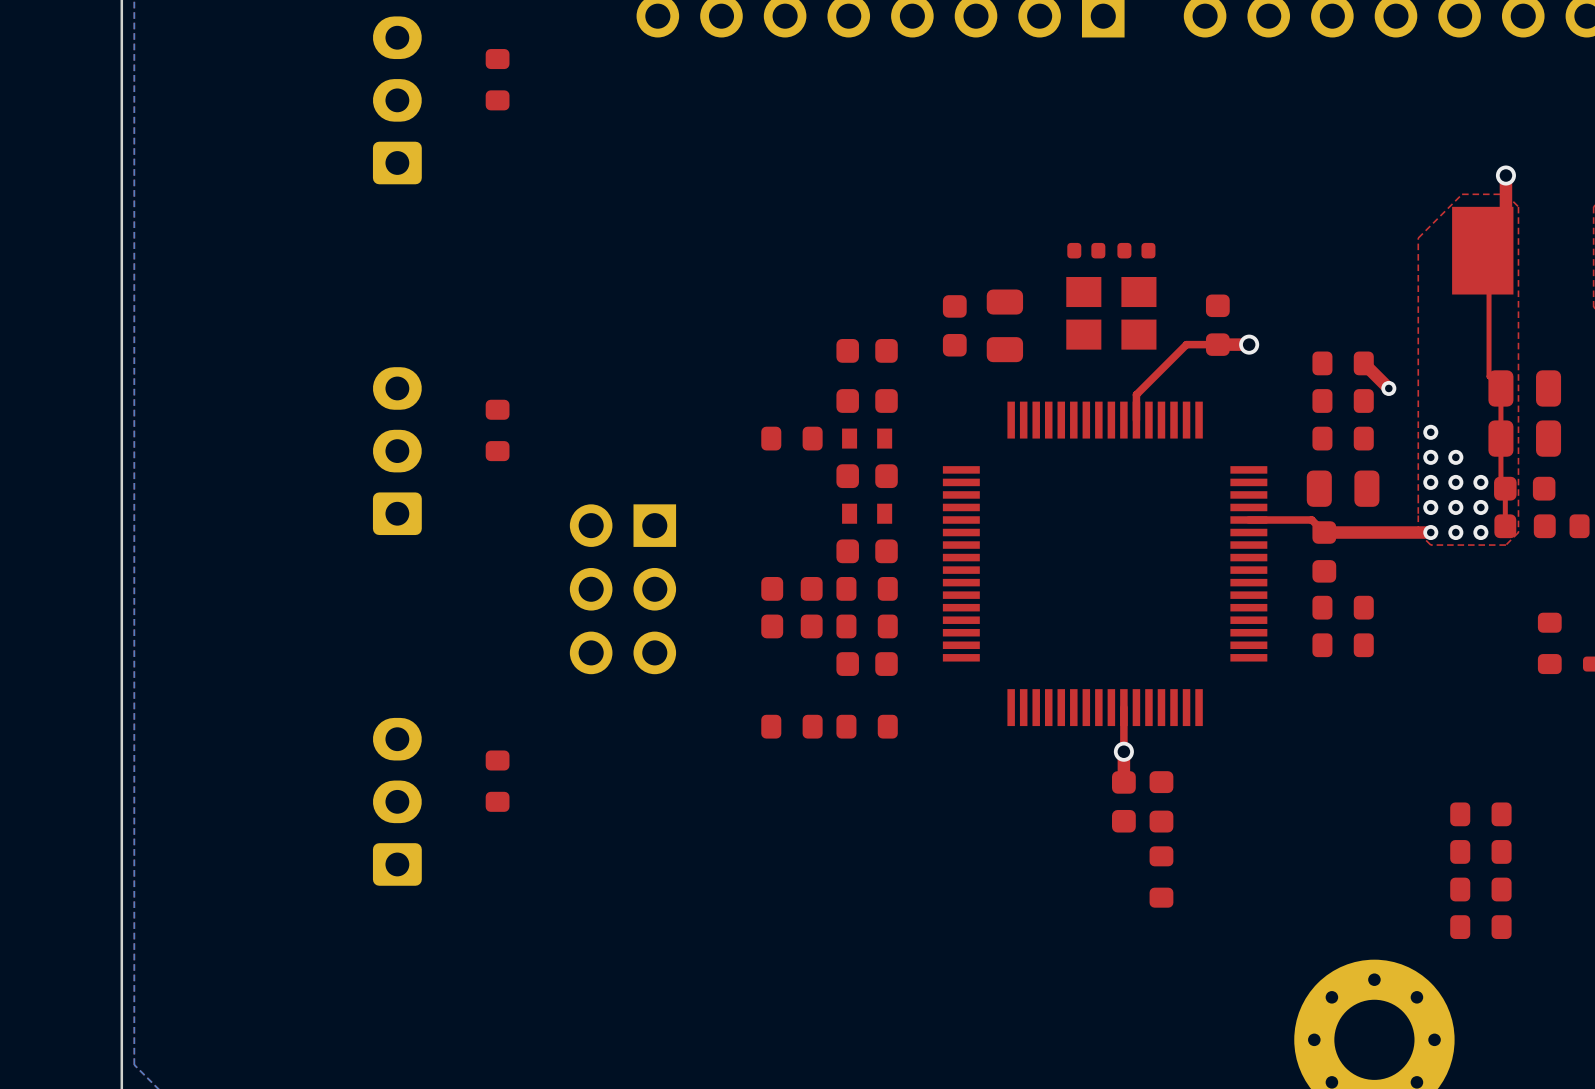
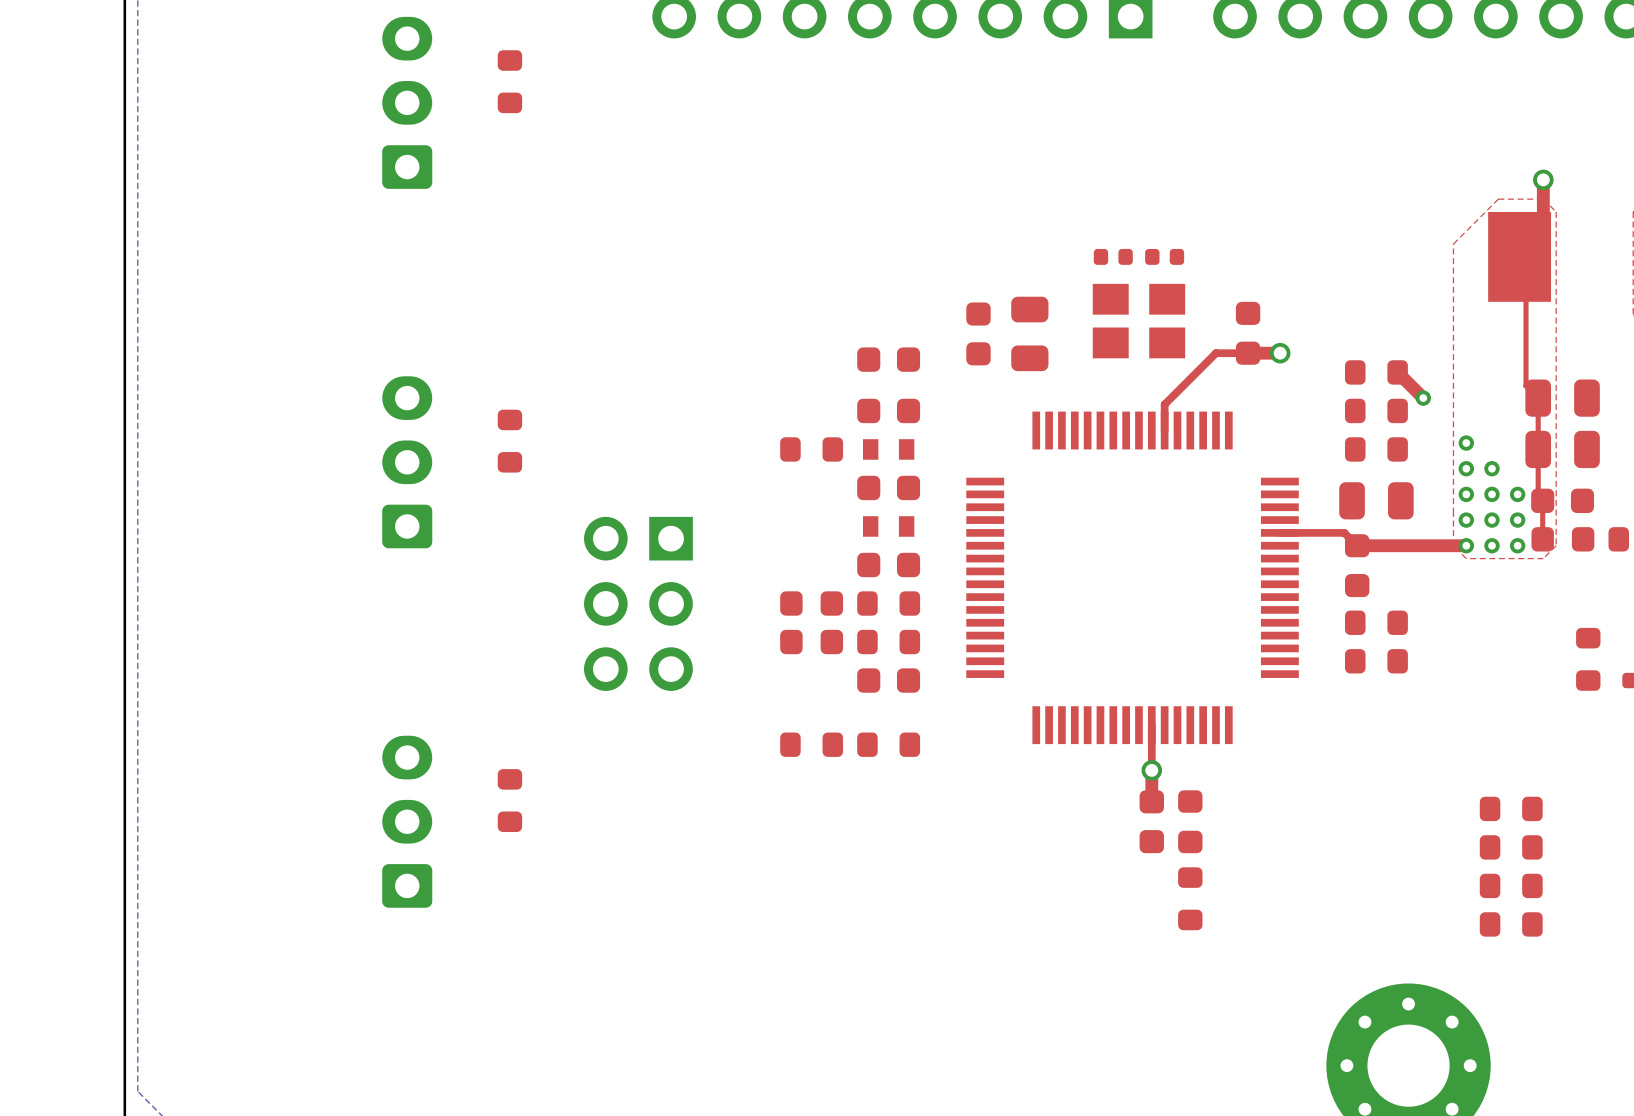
part: none -> (1511, 808)
part: (1480, 814) -> none
part: none -> (1511, 847)
part: (1480, 851) -> none
part: none -> (1511, 885)
part: (1480, 889) -> none
part: none -> (1511, 924)
part: (1480, 927) -> none

